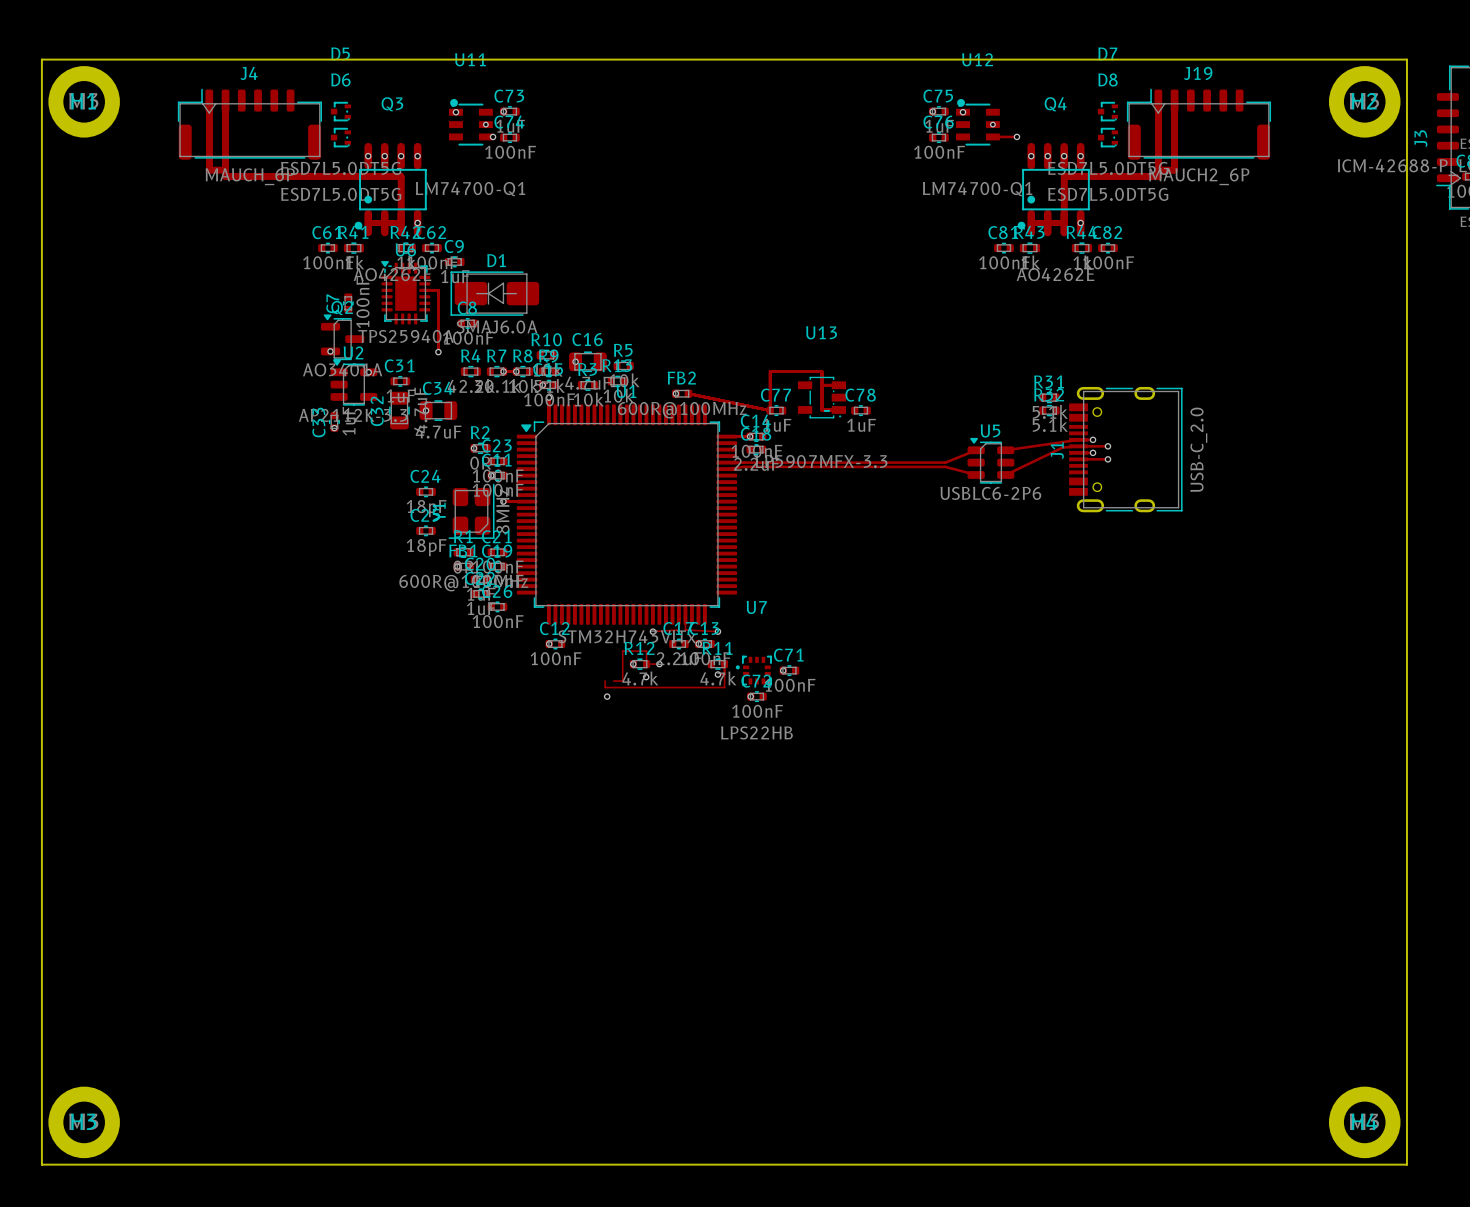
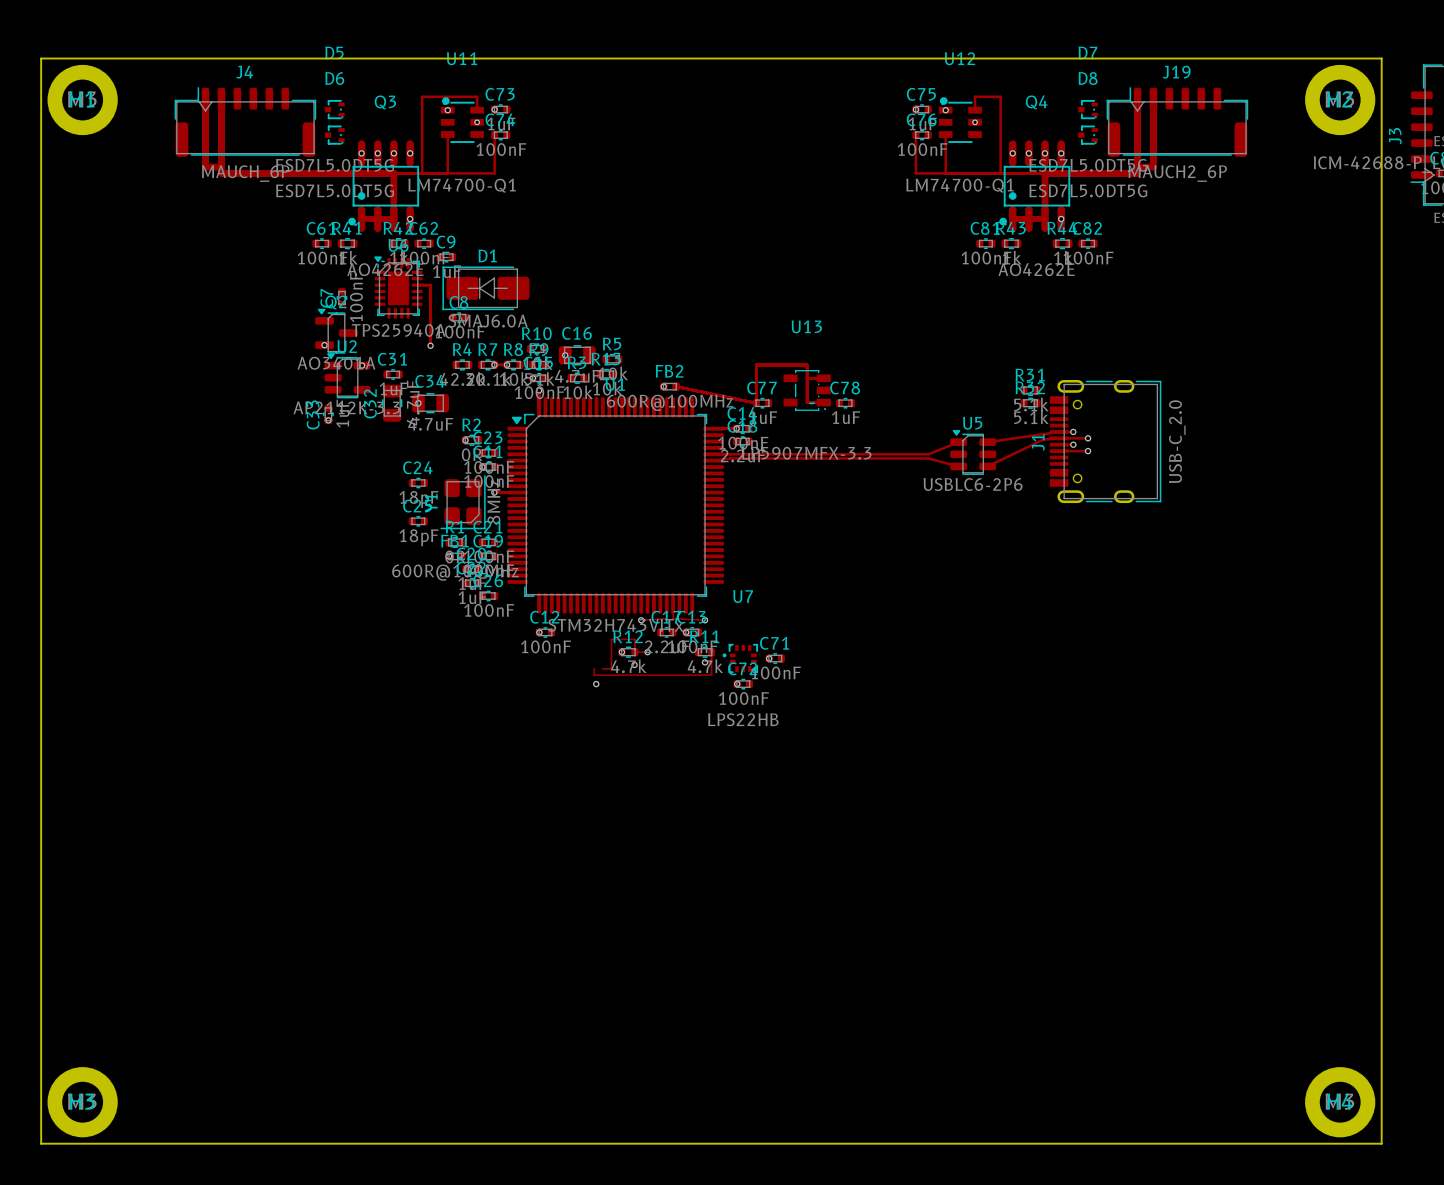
track: none -> (477, 110) (477, 96) (422, 96) (422, 173)
track: none -> (975, 110) (975, 96) (1000, 96) (1000, 173)
track: none -> (447, 134) (447, 173)
via: (493, 136) -> none
track: none -> (945, 134) (945, 173)
track: (992, 136) (1016, 136) -> none
via: (1016, 136) -> none
track: none -> (494, 135) (494, 173) (393, 173)
track: none -> (915, 135) (915, 173) (1045, 173)

